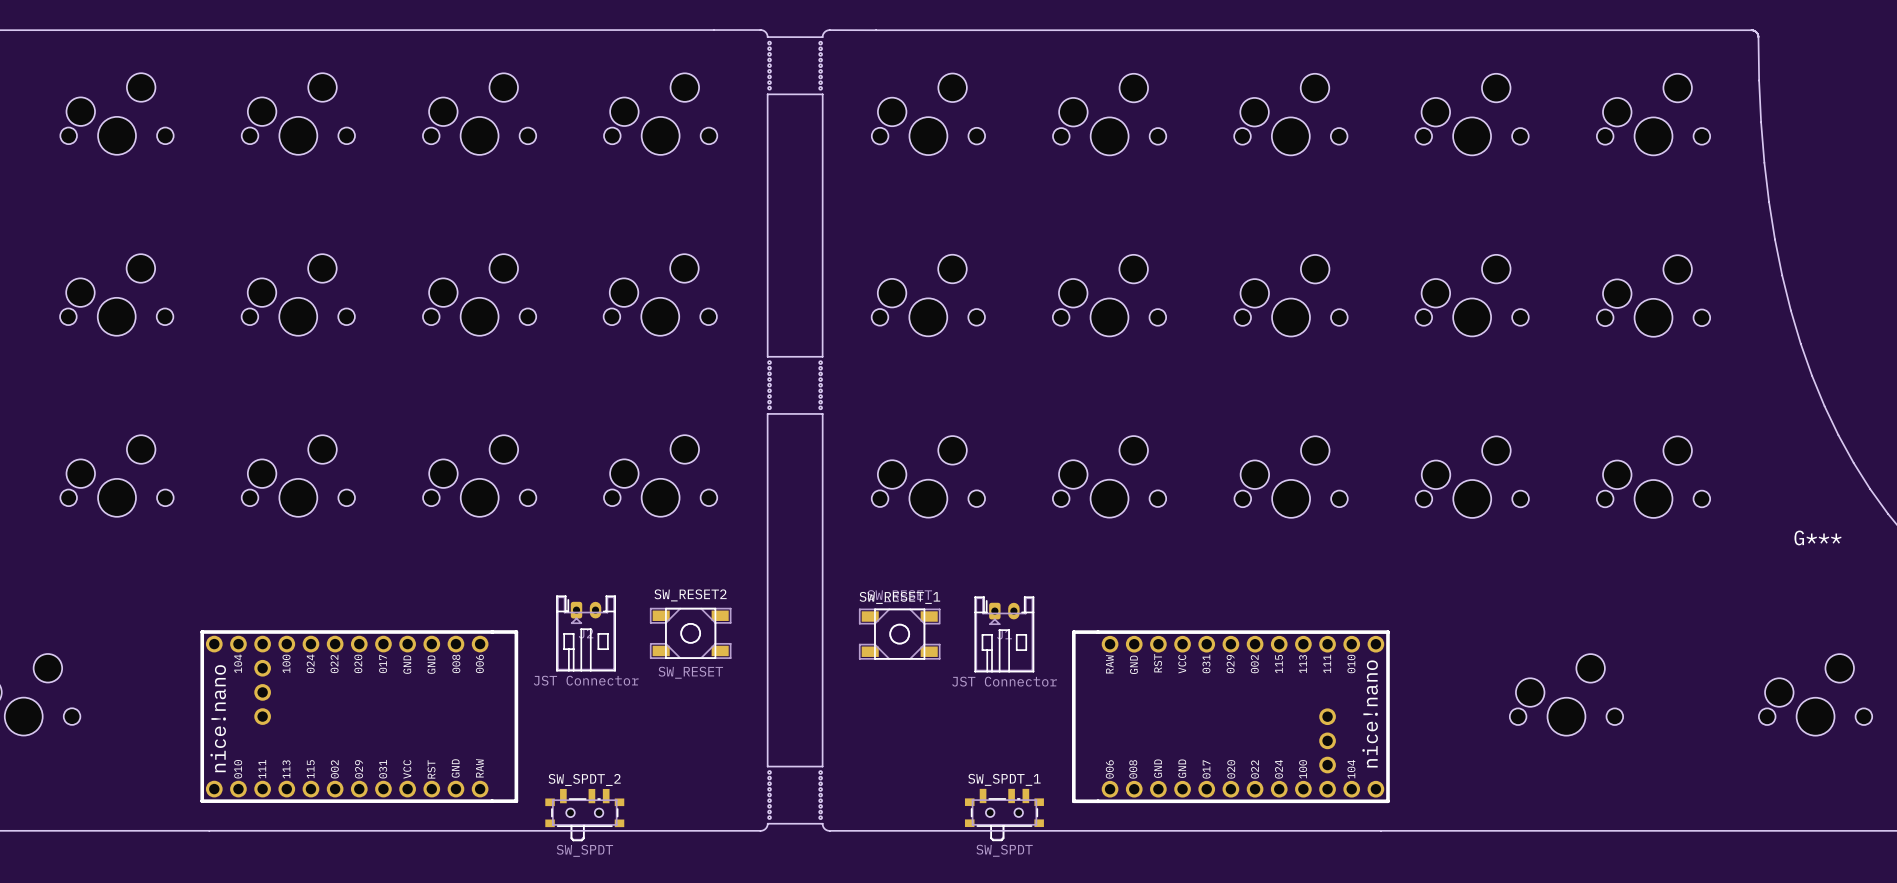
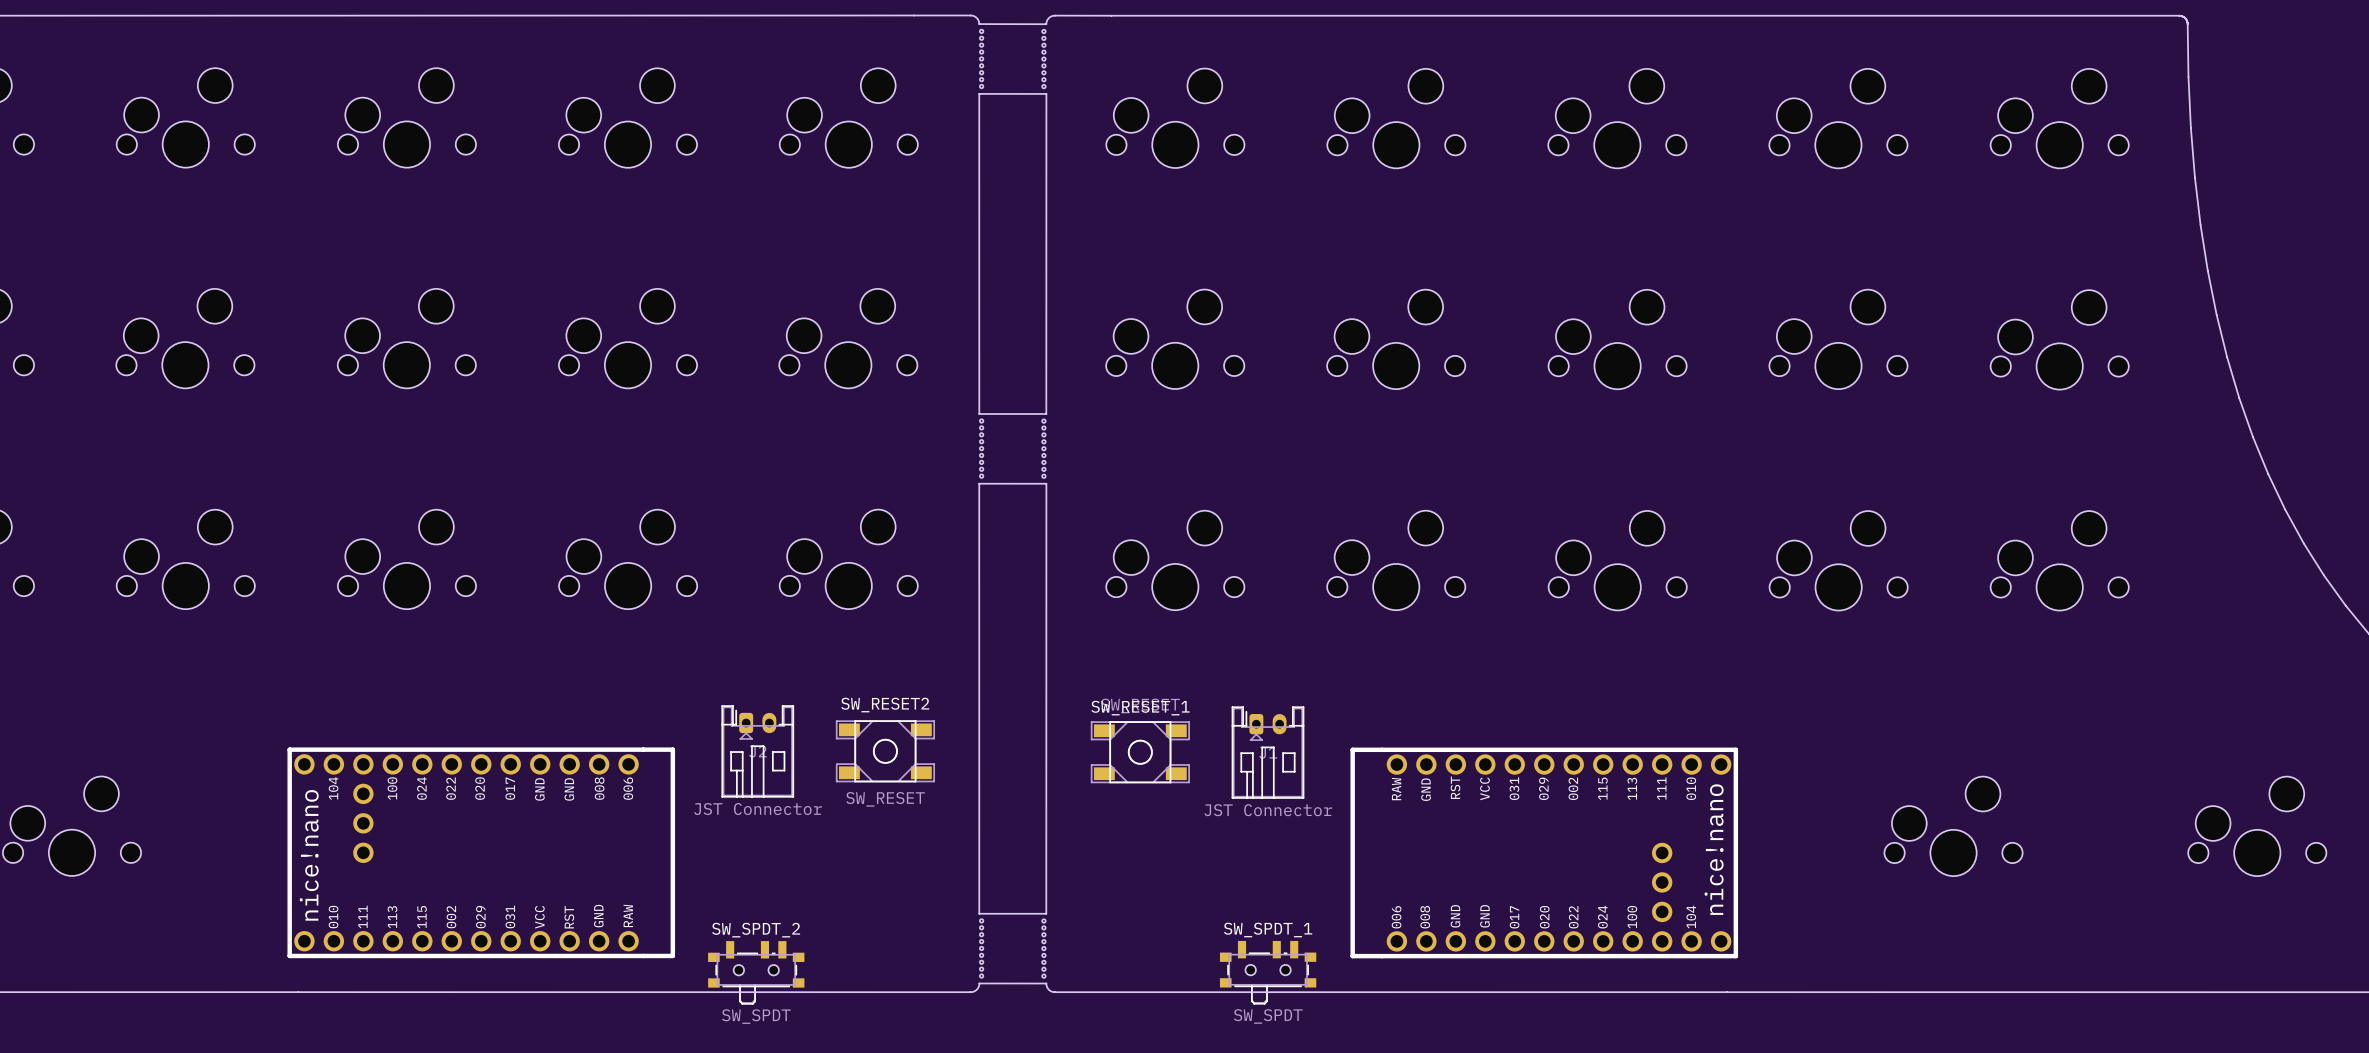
G***: (1818, 537) -> none

